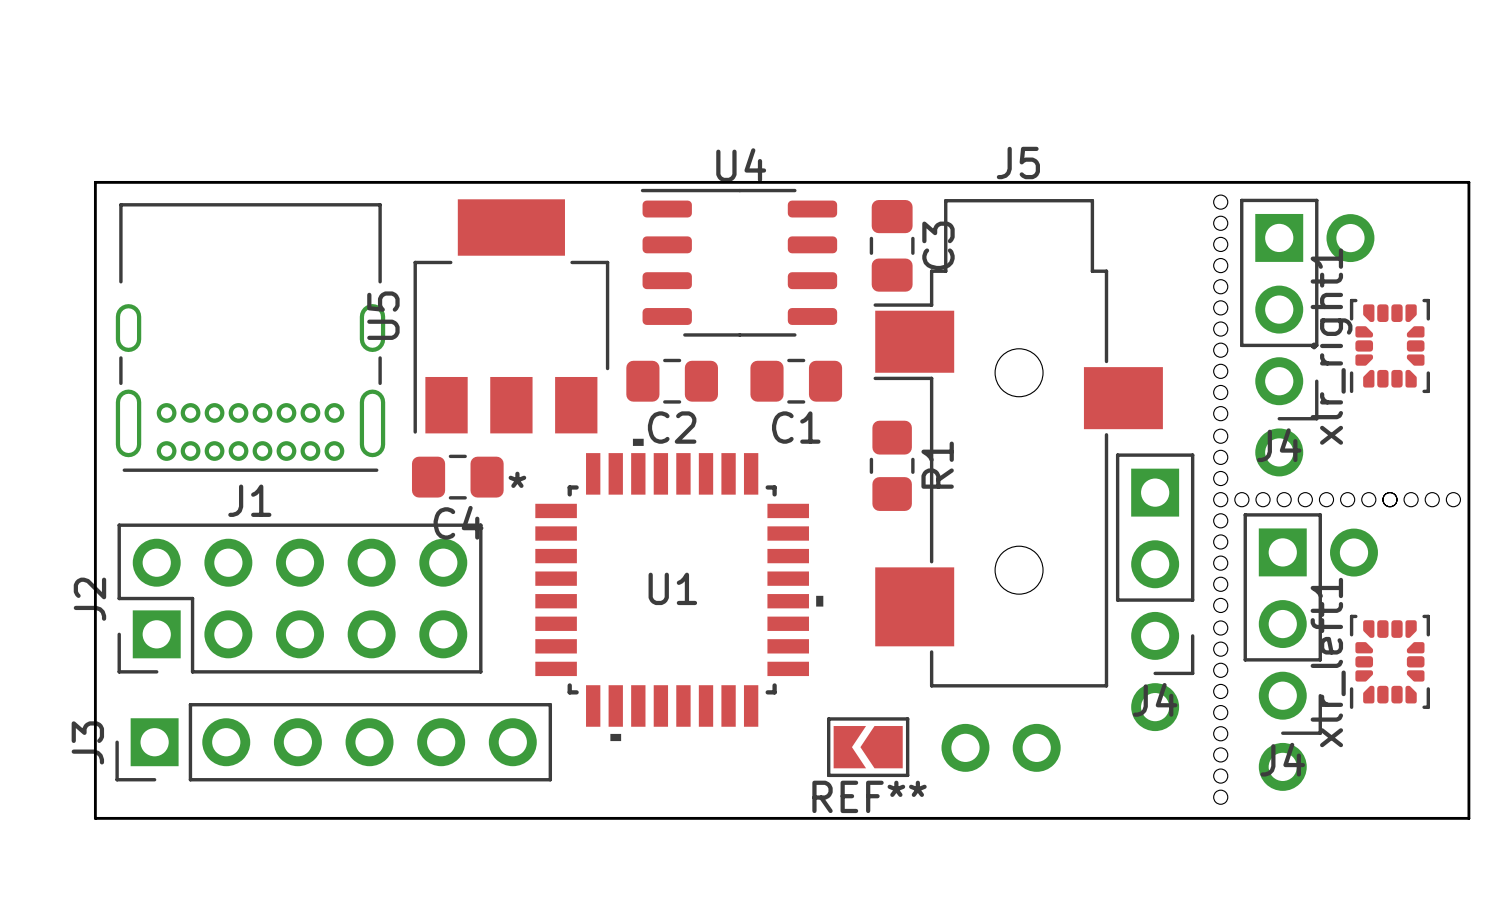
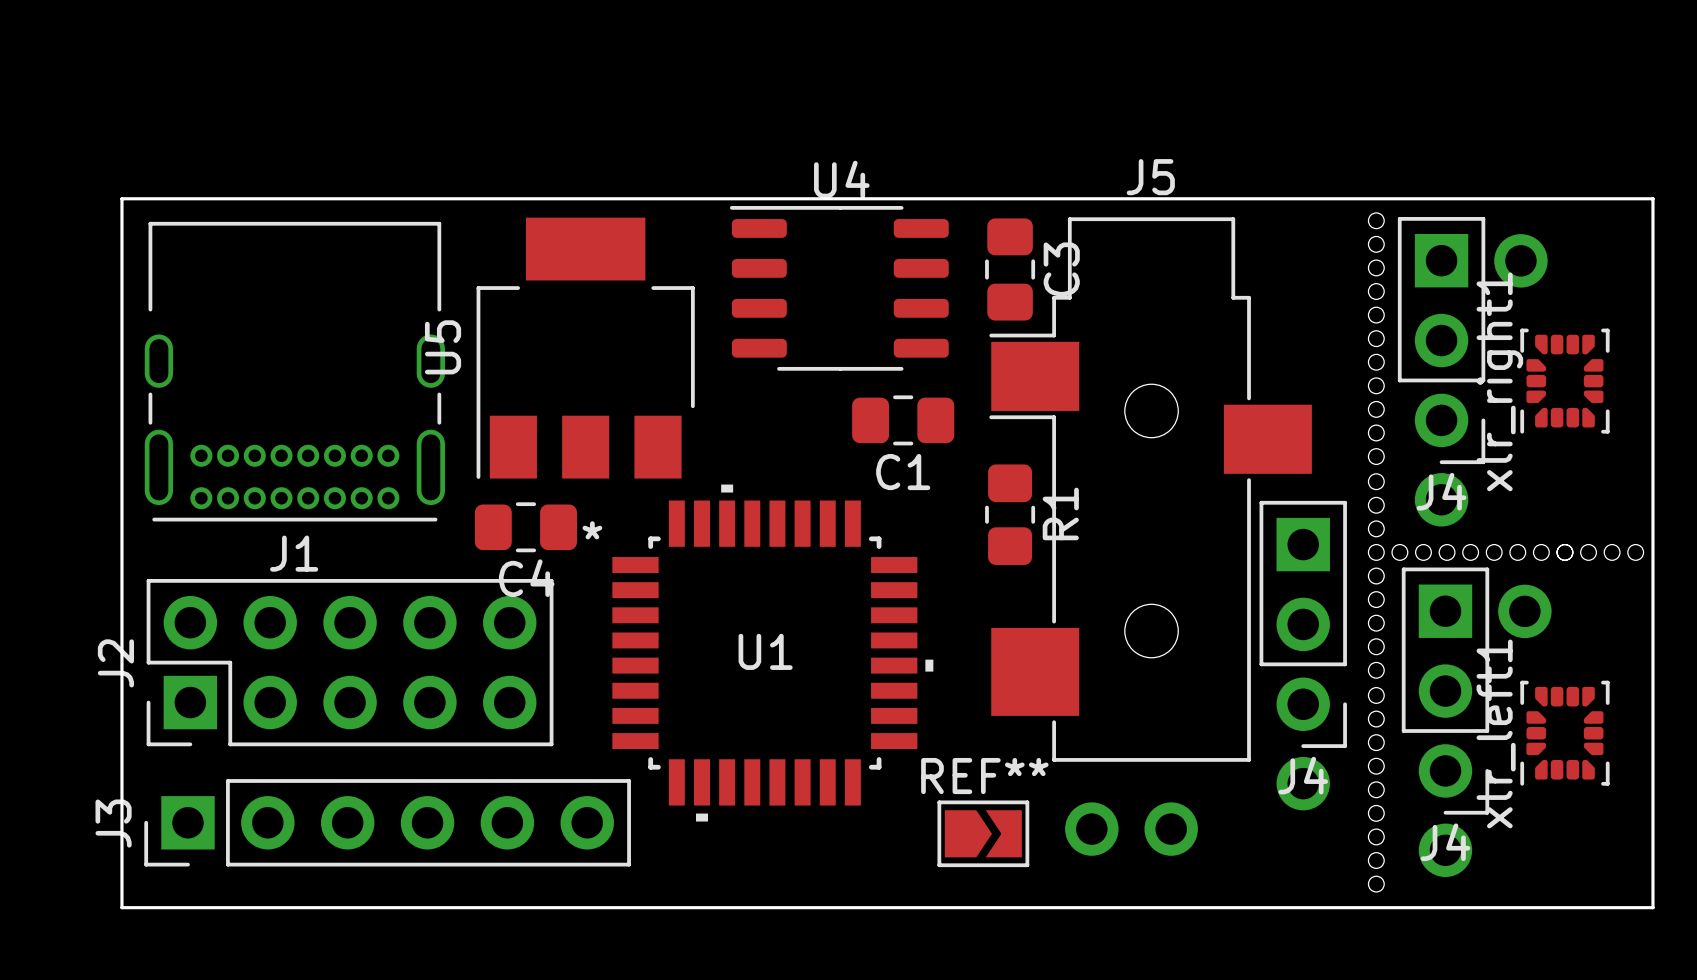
C2: (672, 381) -> none
REF** rotation: 0° (868, 747) -> 180° (983, 833)

